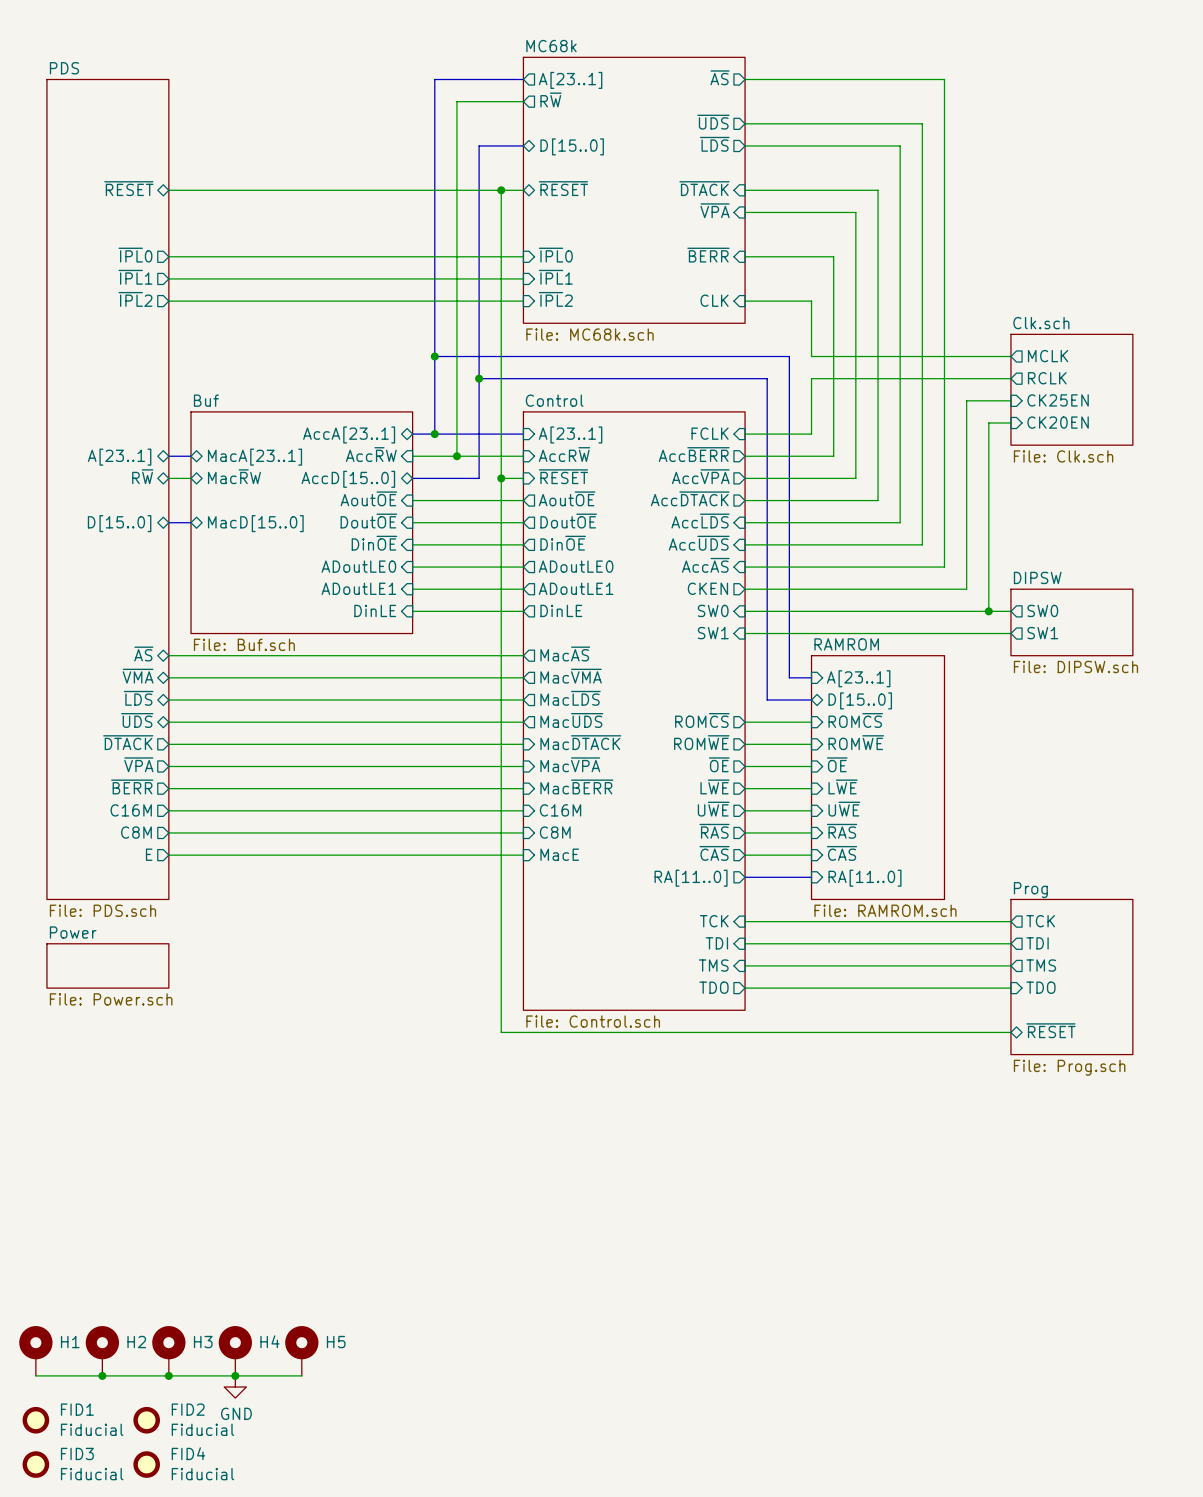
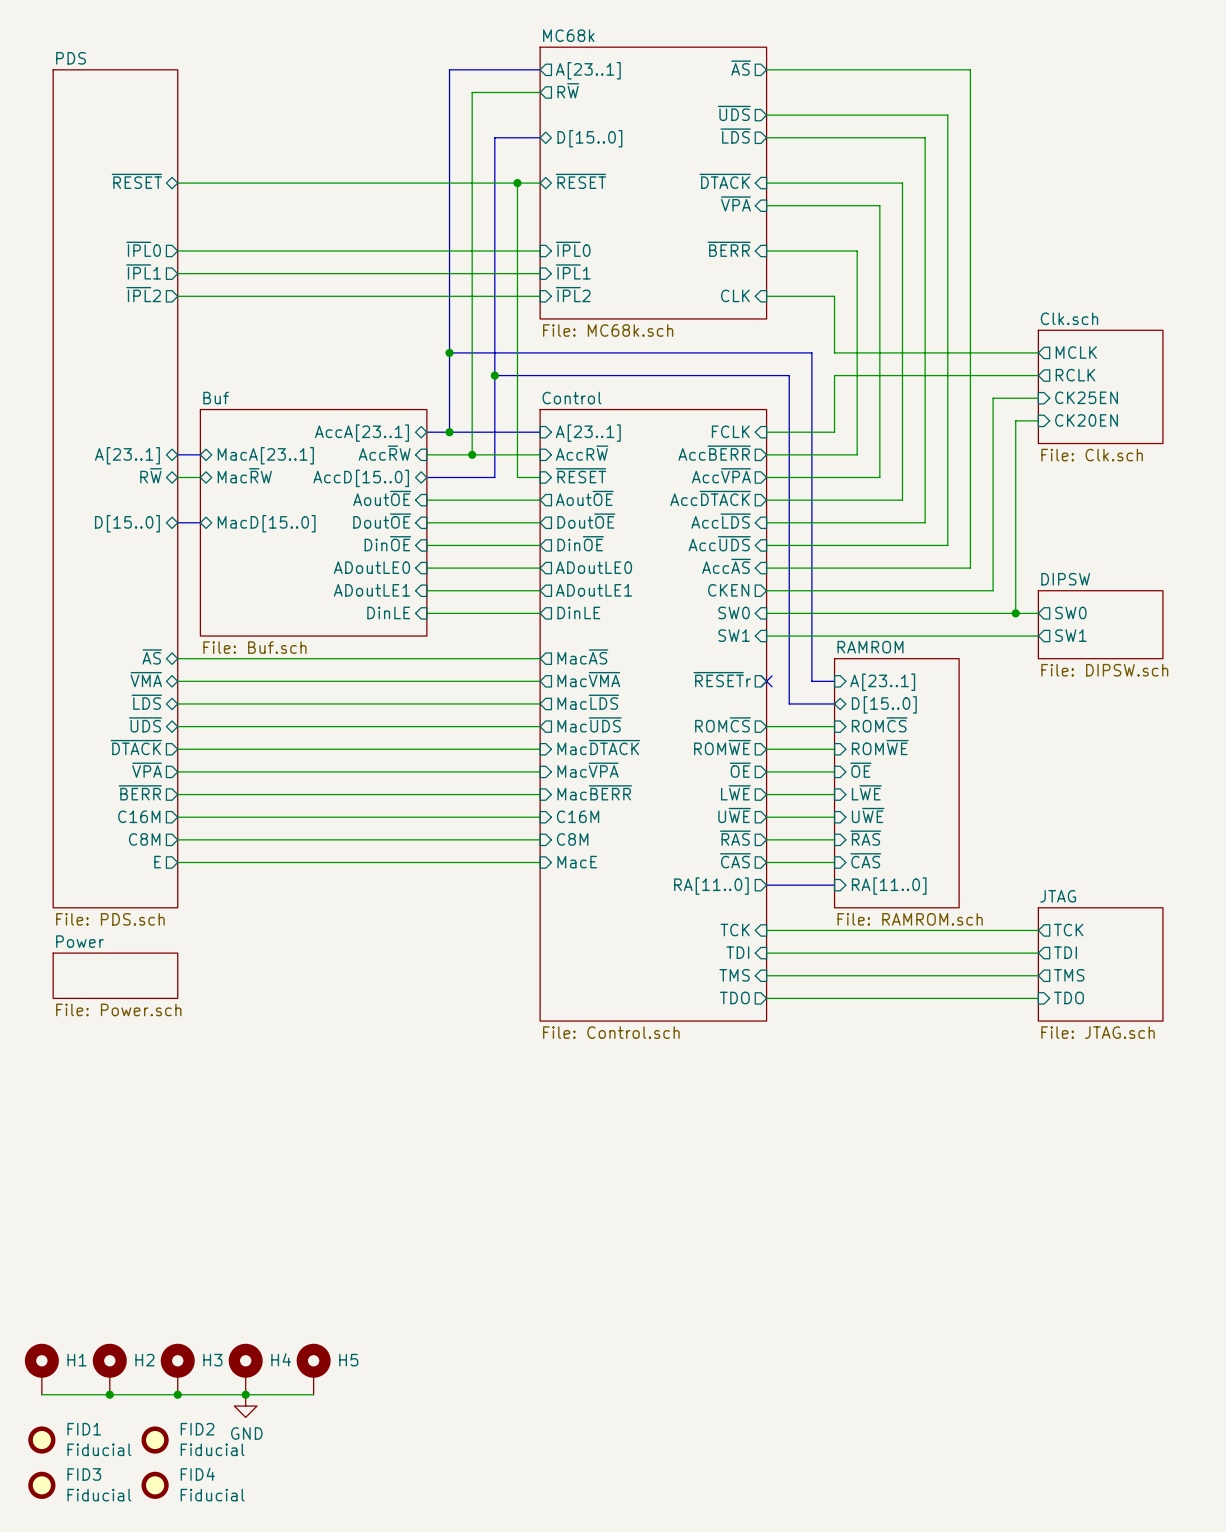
wire: (501, 478) (501, 1032) (1010, 1032) -> none
junction: (501, 478) -> none
sheet RAMROM shape: [811, 655, 945, 900] -> [834, 658, 960, 908]
sheet pin: none -> ~{RESET}r (722, 679)
no-connect mark: none -> (766, 681)
sheet JTAG: none -> File: JTAG.sch (1100, 964)
sheet Prog: File: Prog.sch (1071, 977) -> none
sheet pin: ~{RESET} (1051, 1030) -> none

